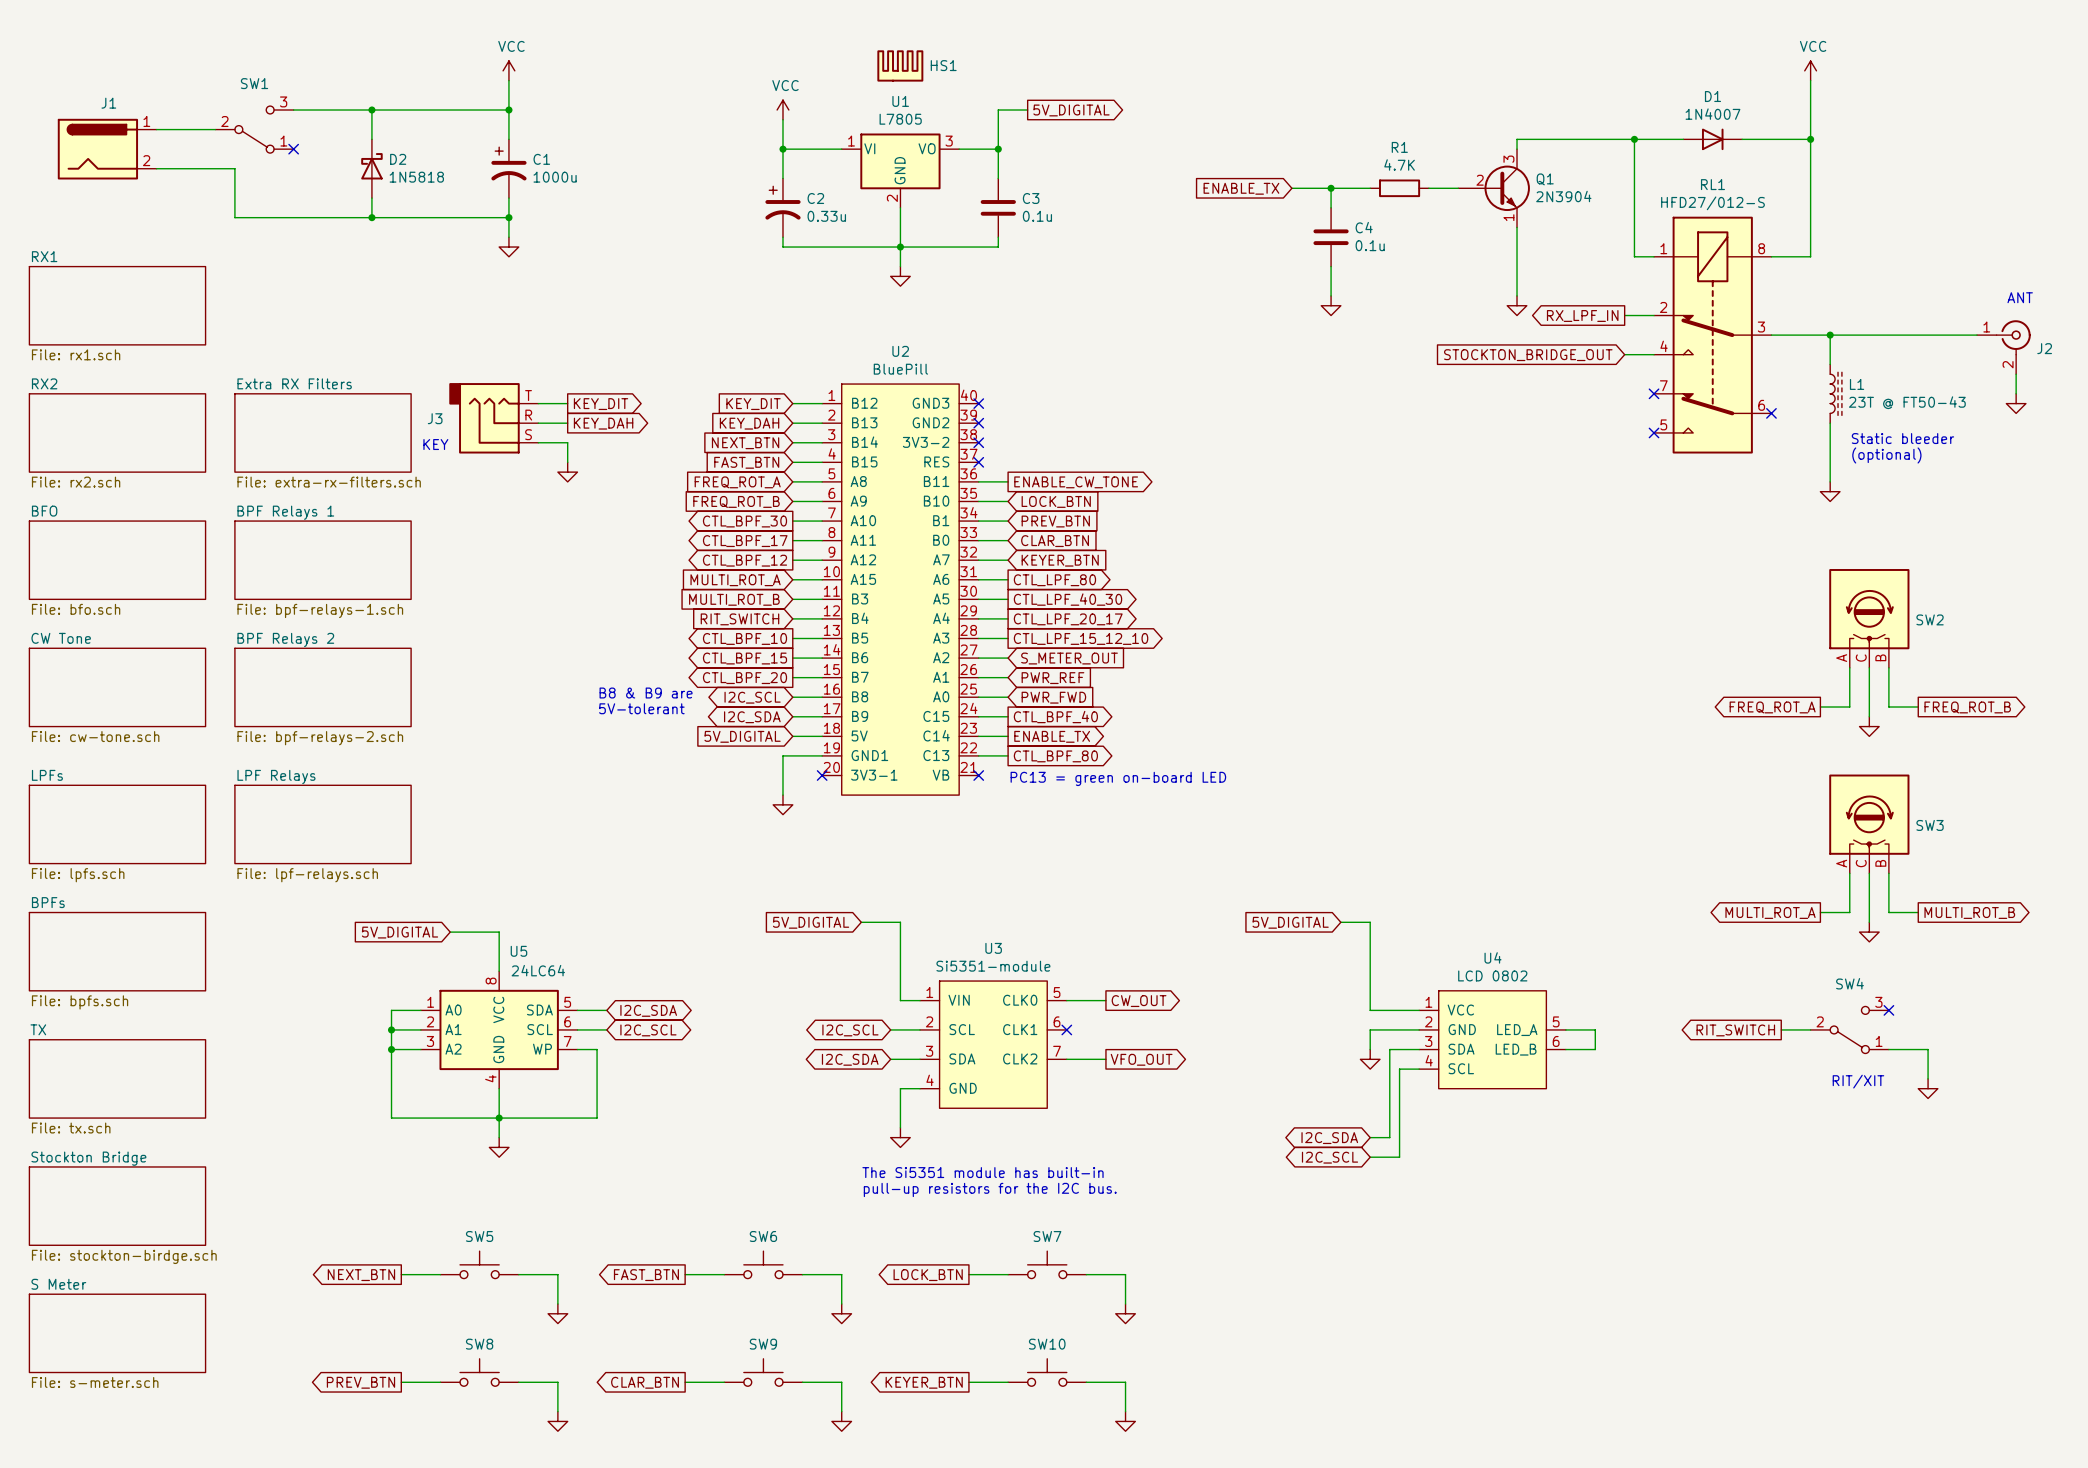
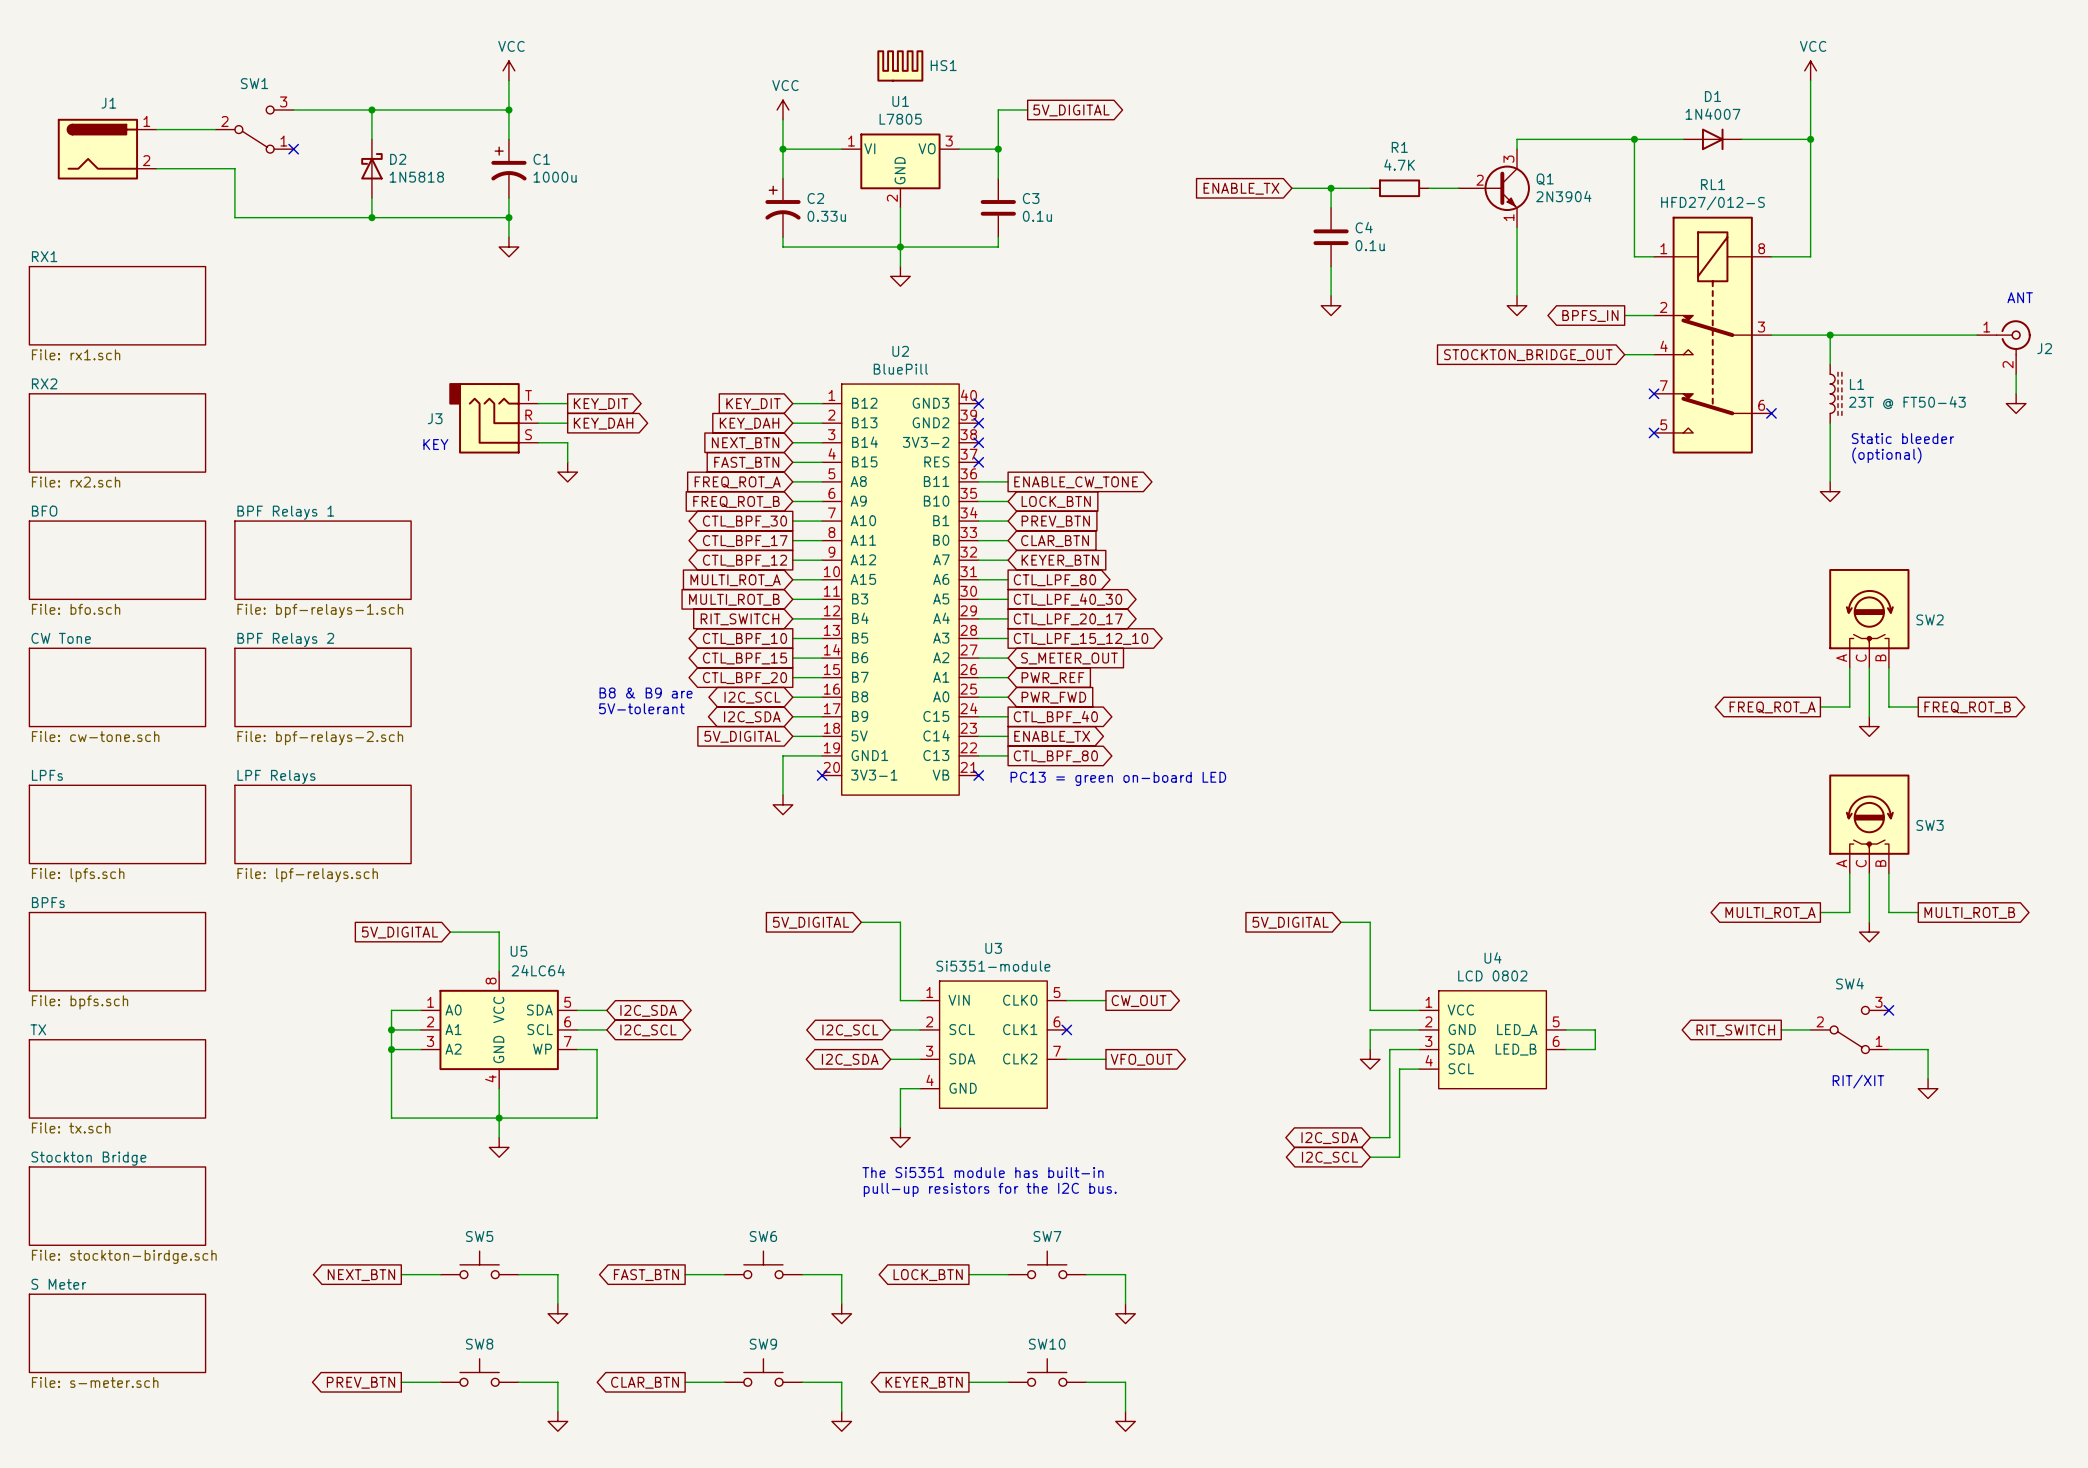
global label: RX_LPF_IN (1582, 315) -> BPFS_IN (1590, 315)
sheet Extra RX Filters: File: extra-rx-filters.sch (323, 432) -> none

